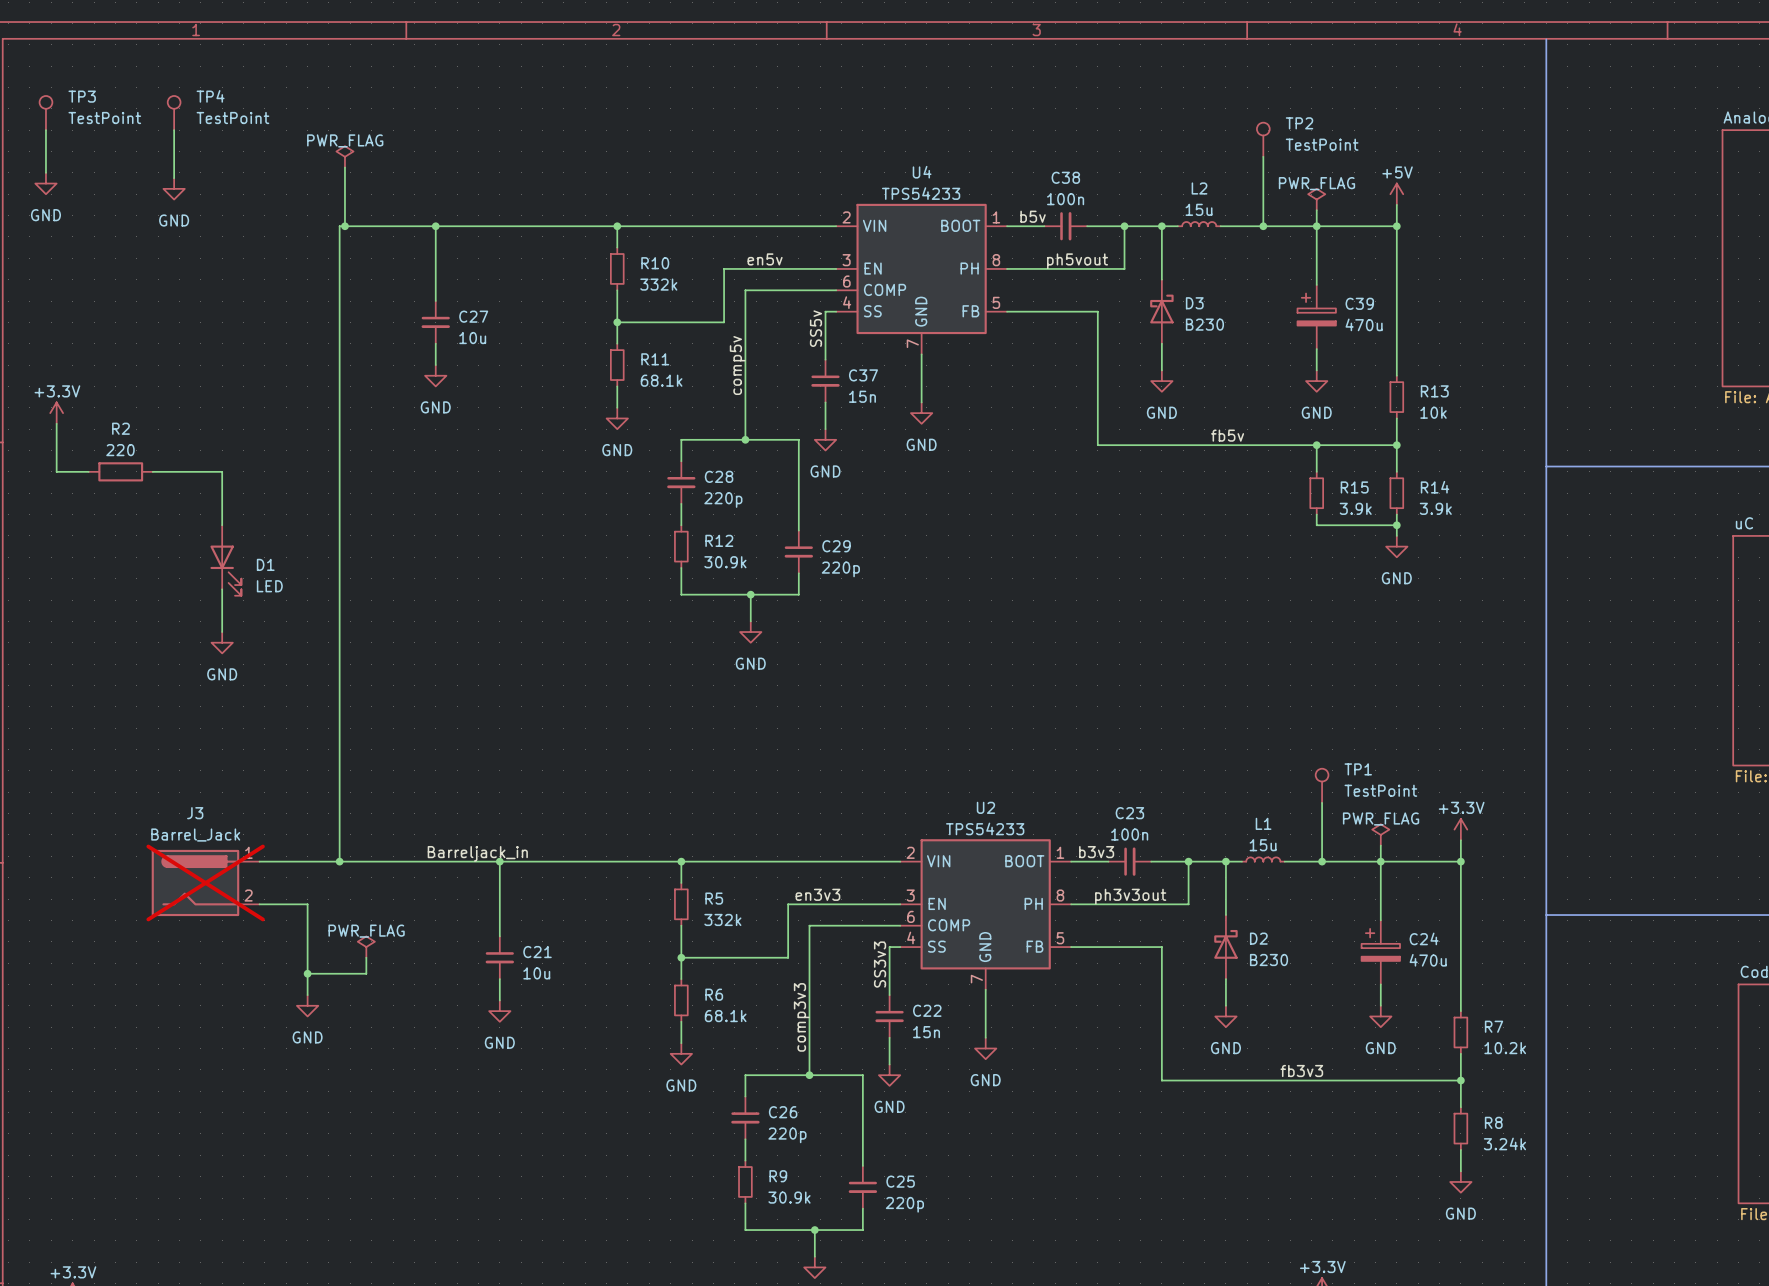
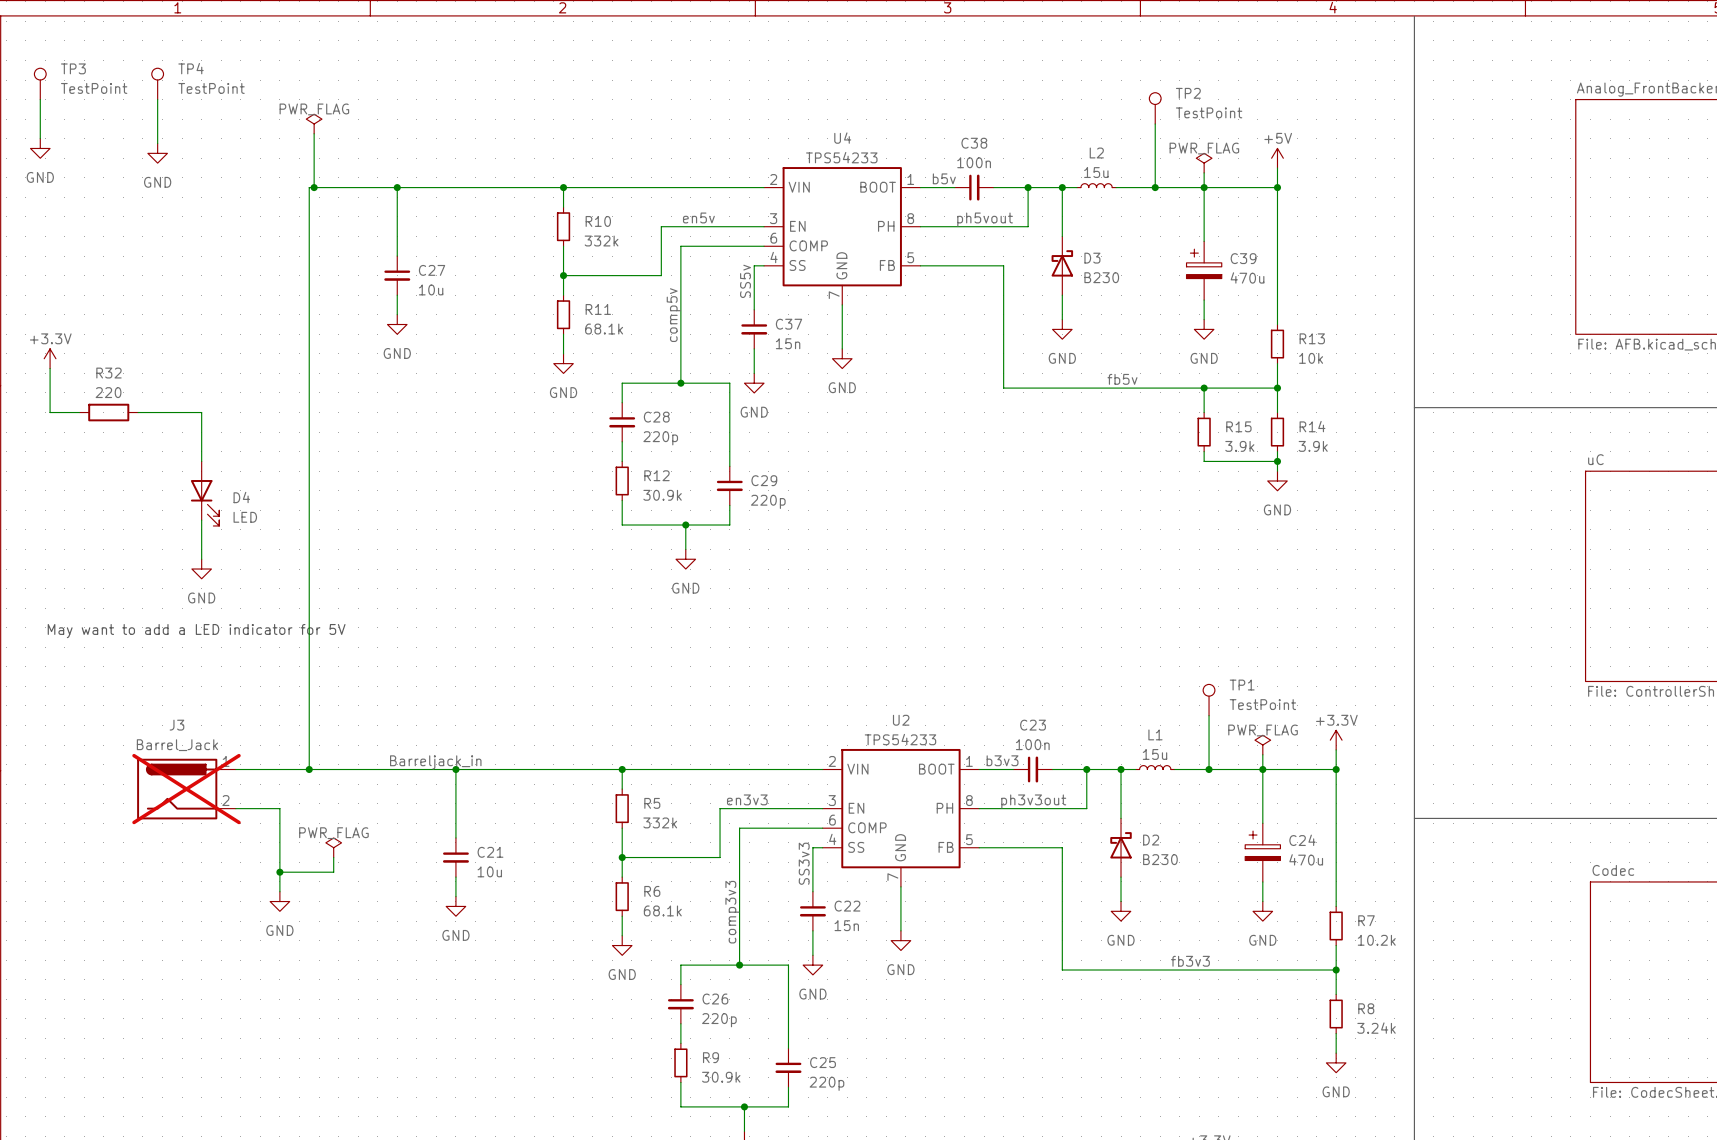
R2 name: R2 (120, 428) -> R32 (108, 373)
D1 name: D1 (265, 564) -> D4 (241, 497)
text: none -> May want to add a LED indicator for 5V (196, 631)

